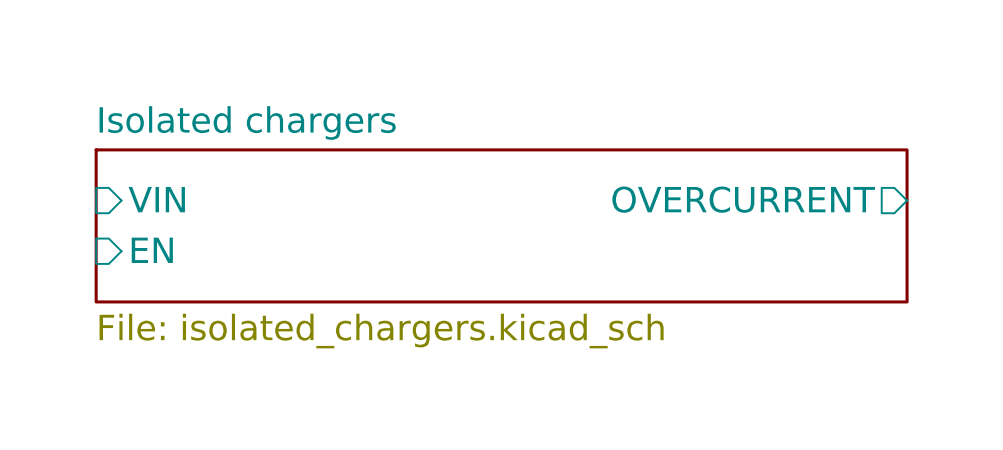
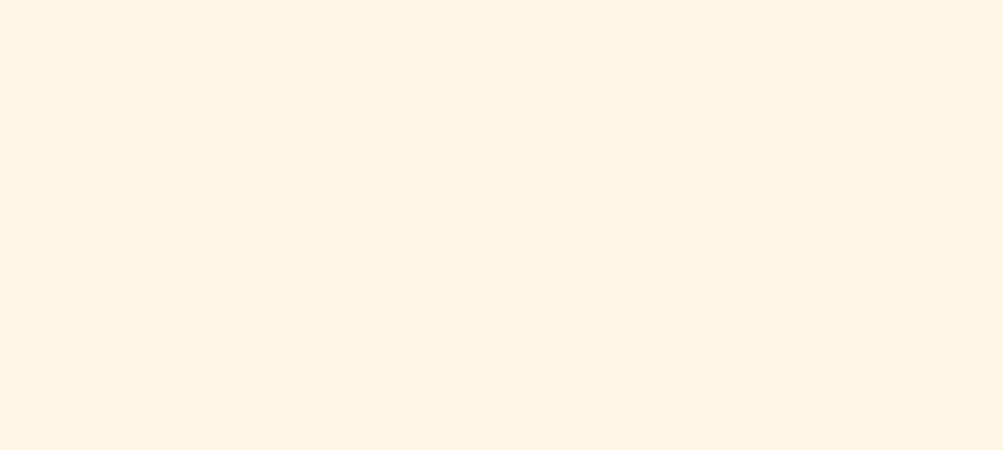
sheet pin: VIN (156, 199) -> none
sheet pin: OVERCURRENT (743, 199) -> none
sheet Isolated chargers: File: isolated_chargers.kicad_sch (501, 225) -> none
sheet pin: EN (152, 250) -> none

